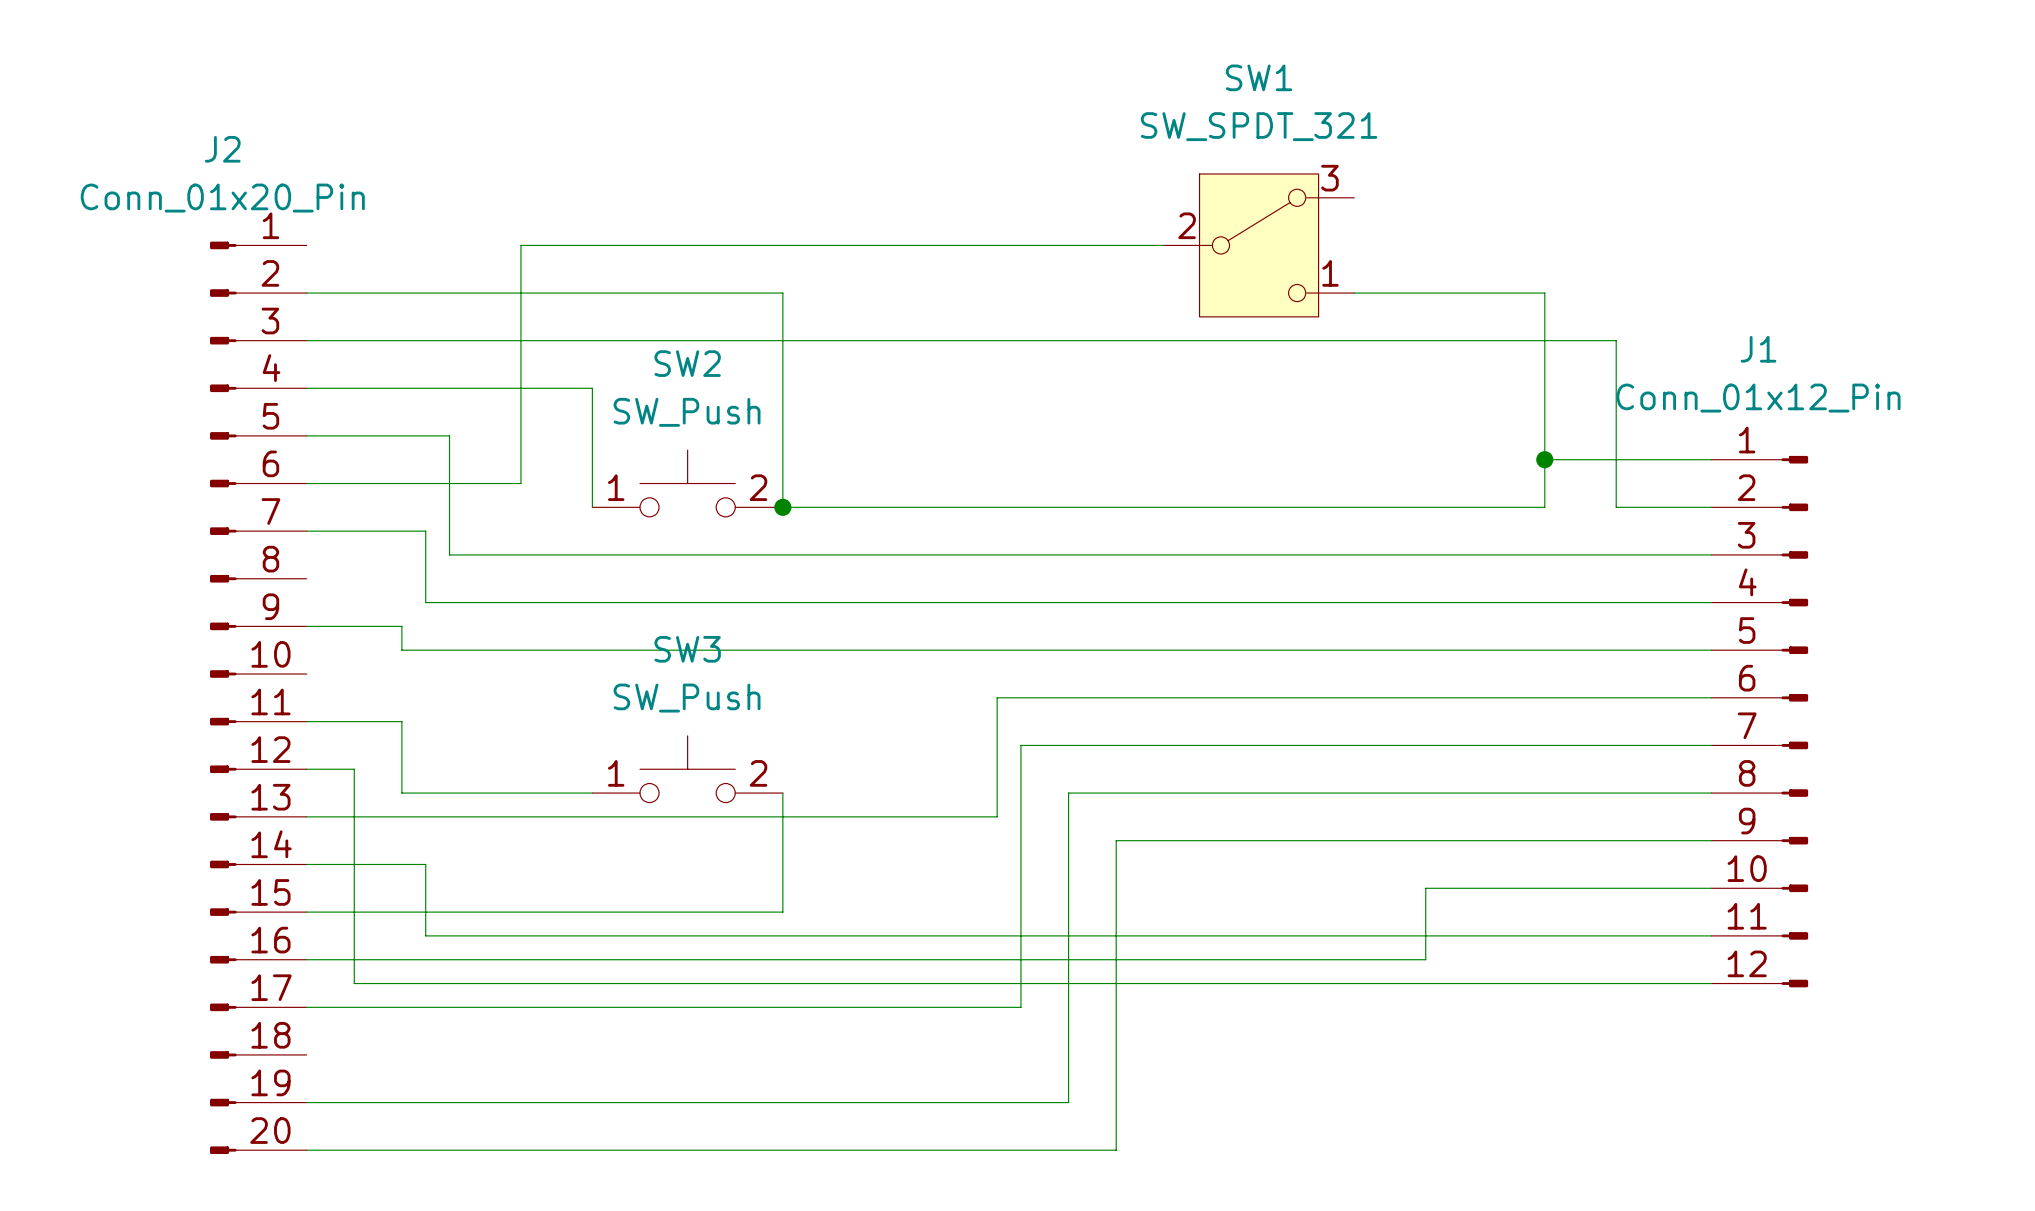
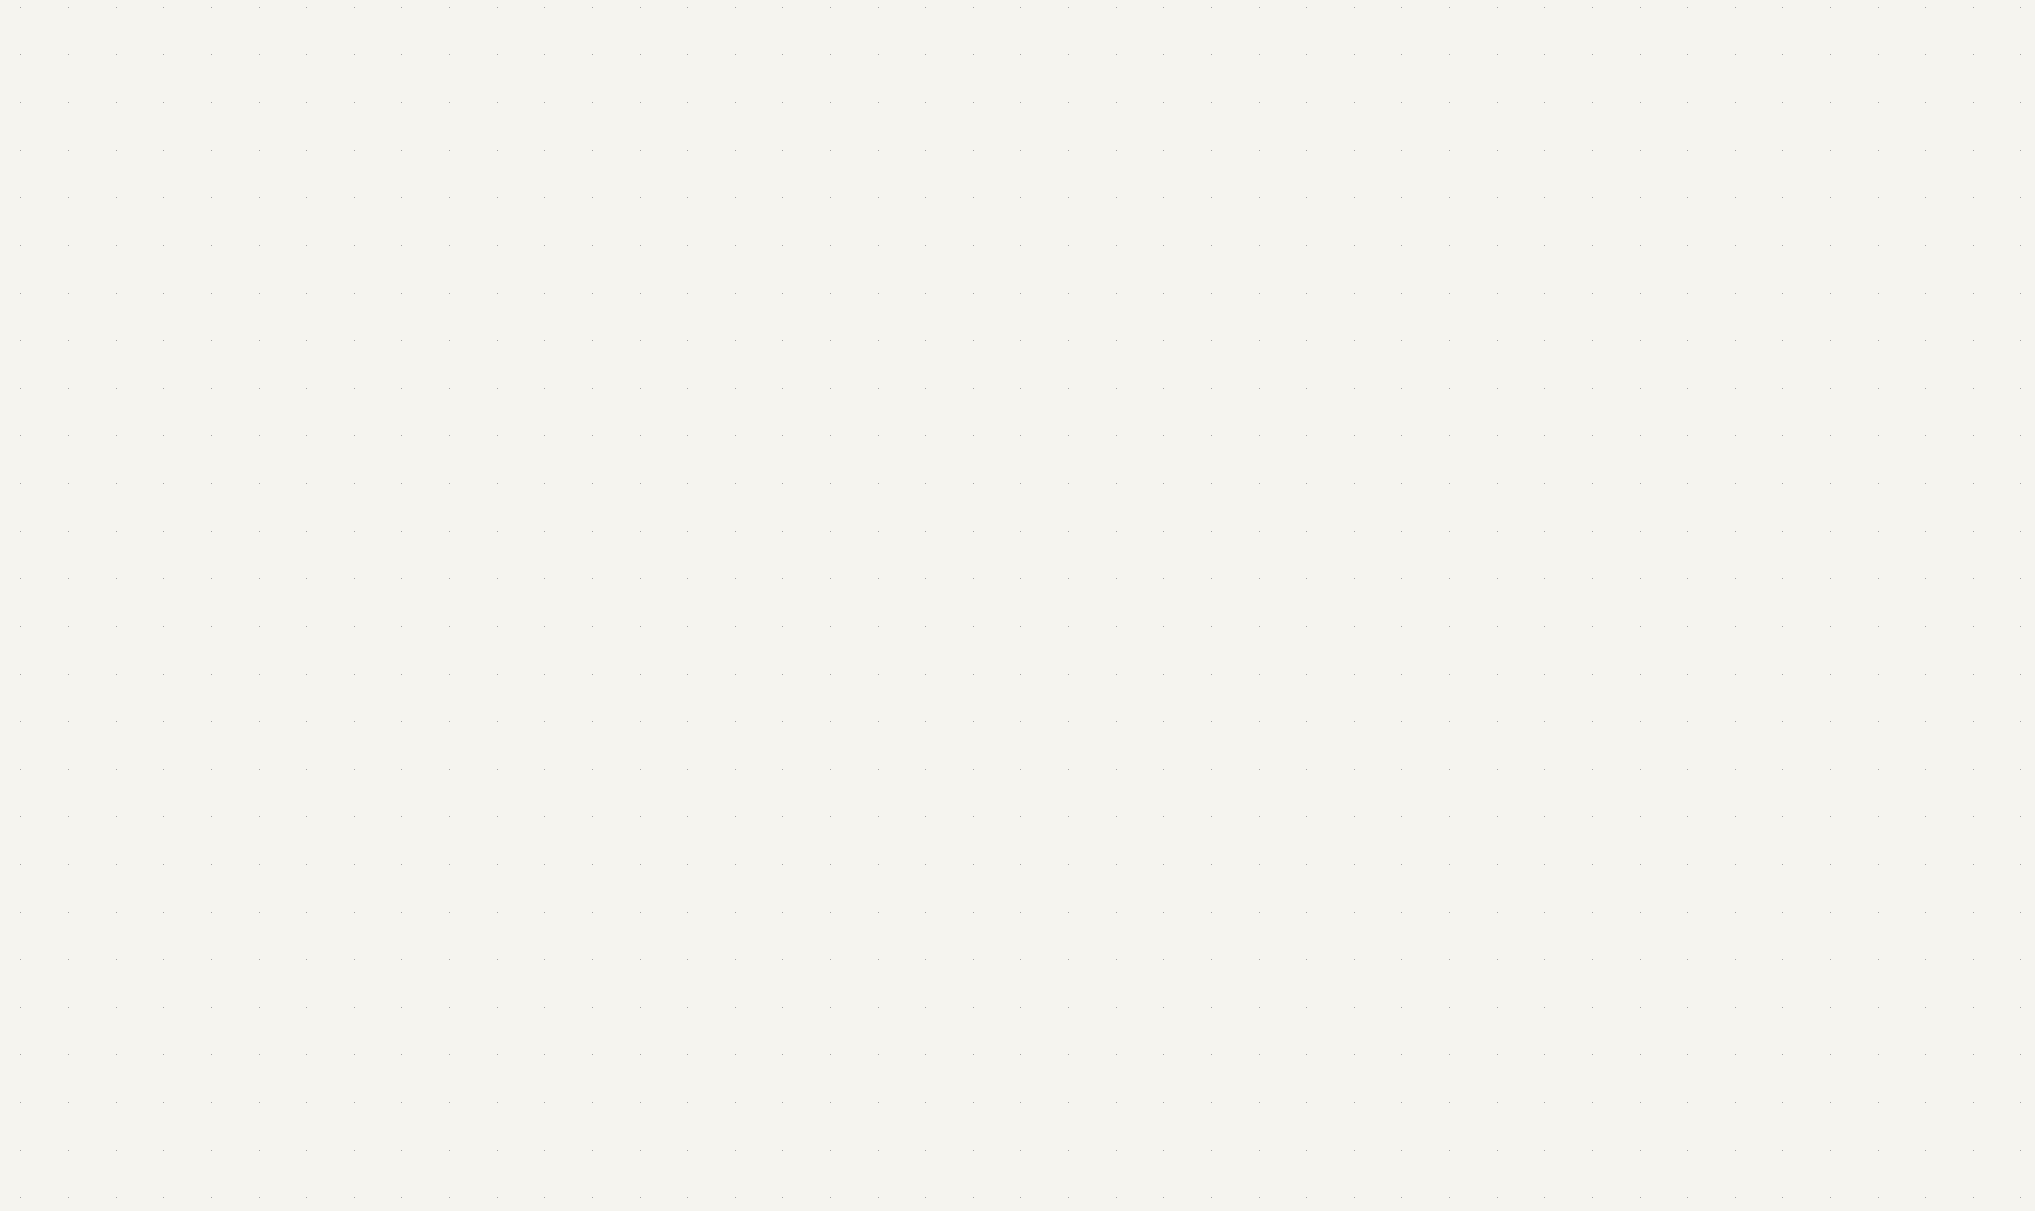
wire: (1163, 245) (520, 245) (520, 483) (306, 483) -> none
SW1: SW_SPDT_321 (1259, 245) -> none
wire: (306, 293) (782, 293) (782, 507) (1544, 507) (1544, 293) (1354, 293) -> none
wire: (306, 340) (1616, 340) (1616, 507) (1711, 507) -> none
wire: (306, 388) (592, 388) (592, 507) -> none
wire: (306, 435) (449, 435) (449, 554) (1711, 554) -> none
wire: (1544, 459) (1711, 459) -> none
junction: (1544, 459) -> none
SW2: SW_Push (687, 483) -> none
junction: (782, 507) -> none
wire: (306, 531) (425, 531) (425, 602) (1711, 602) -> none
wire: (306, 626) (401, 626) (401, 650) (1711, 650) -> none
J2: Conn_01x20_Pin (258, 697) -> none
wire: (1711, 697) (997, 697) (997, 816) (306, 816) -> none
wire: (306, 721) (401, 721) (401, 793) (592, 793) -> none
J1: Conn_01x12_Pin (1759, 721) -> none
wire: (1711, 745) (1020, 745) (1020, 1007) (306, 1007) -> none
wire: (306, 769) (354, 769) (354, 983) (1711, 983) -> none
SW3: SW_Push (687, 769) -> none
wire: (782, 793) (782, 912) (306, 912) -> none
wire: (1711, 793) (1068, 793) (1068, 1102) (306, 1102) -> none
wire: (1711, 840) (1116, 840) (1116, 1150) (306, 1150) -> none
wire: (306, 864) (425, 864) (425, 935) (1711, 935) -> none
wire: (1711, 888) (1425, 888) (1425, 959) (306, 959) -> none

